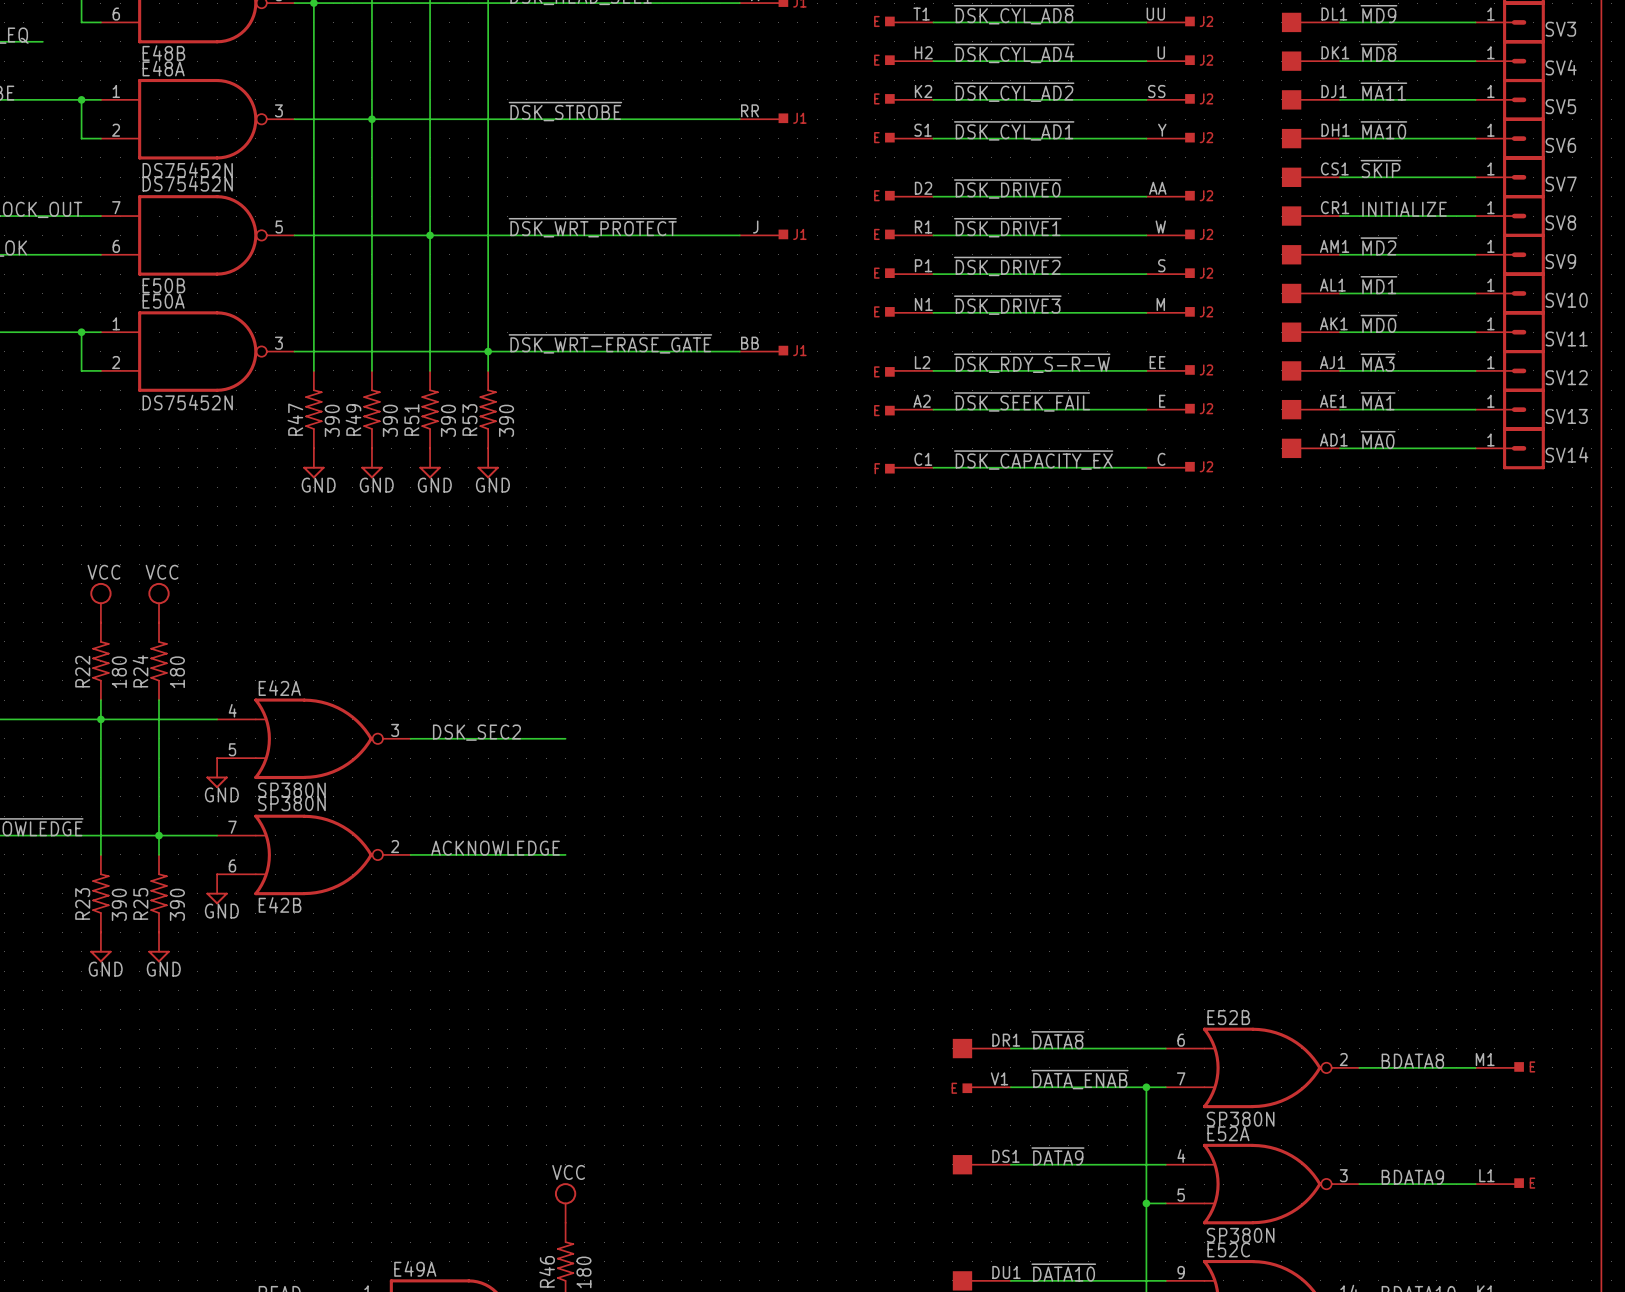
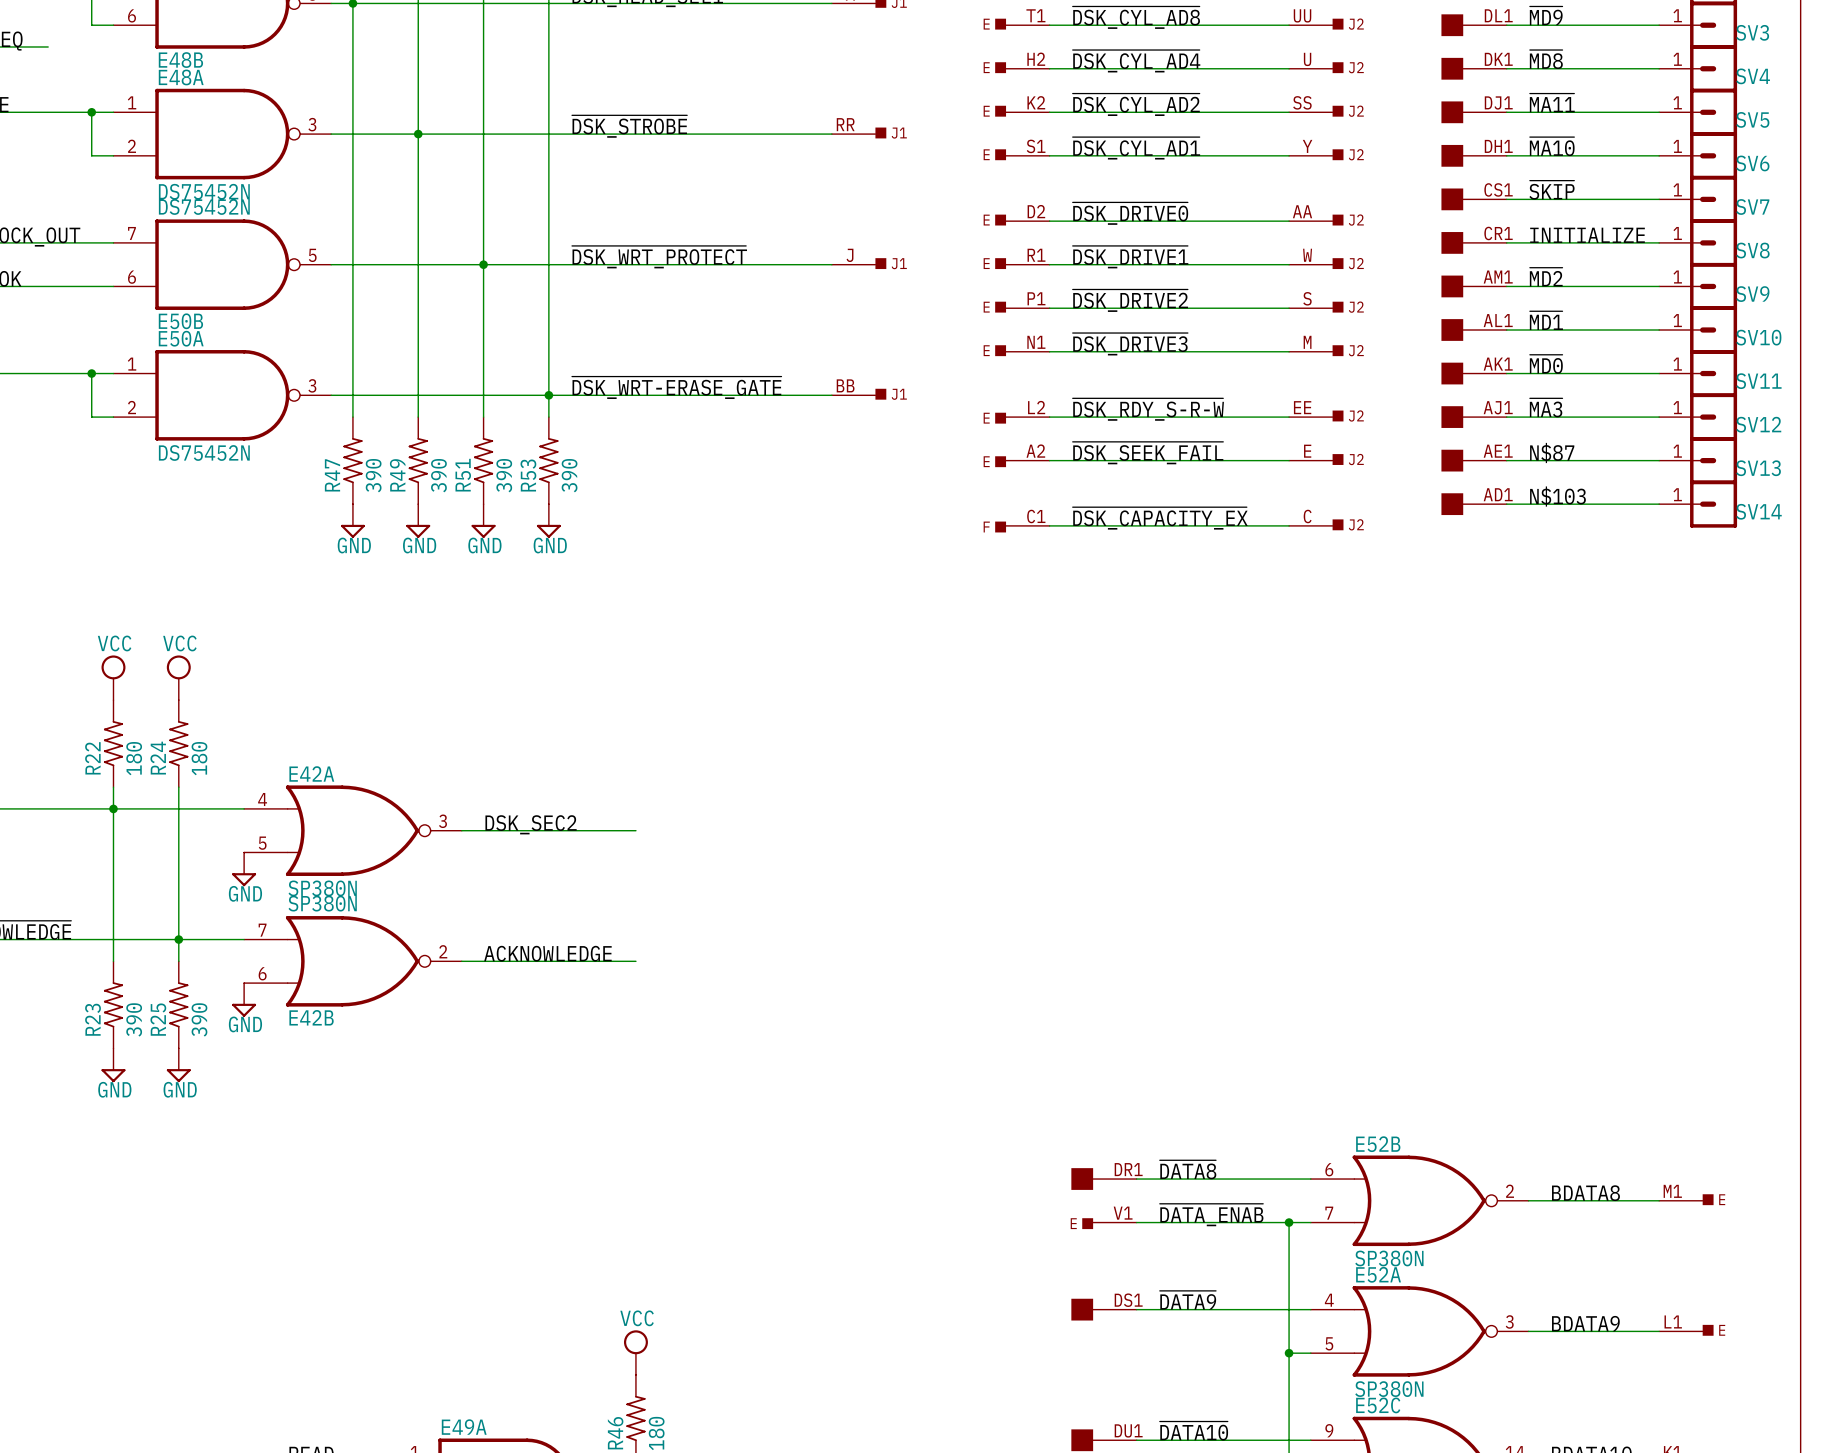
label: ~{MA1} (1378, 401) -> N$87 (1552, 452)
label: ~{MA0} (1378, 440) -> N$103 (1557, 496)

